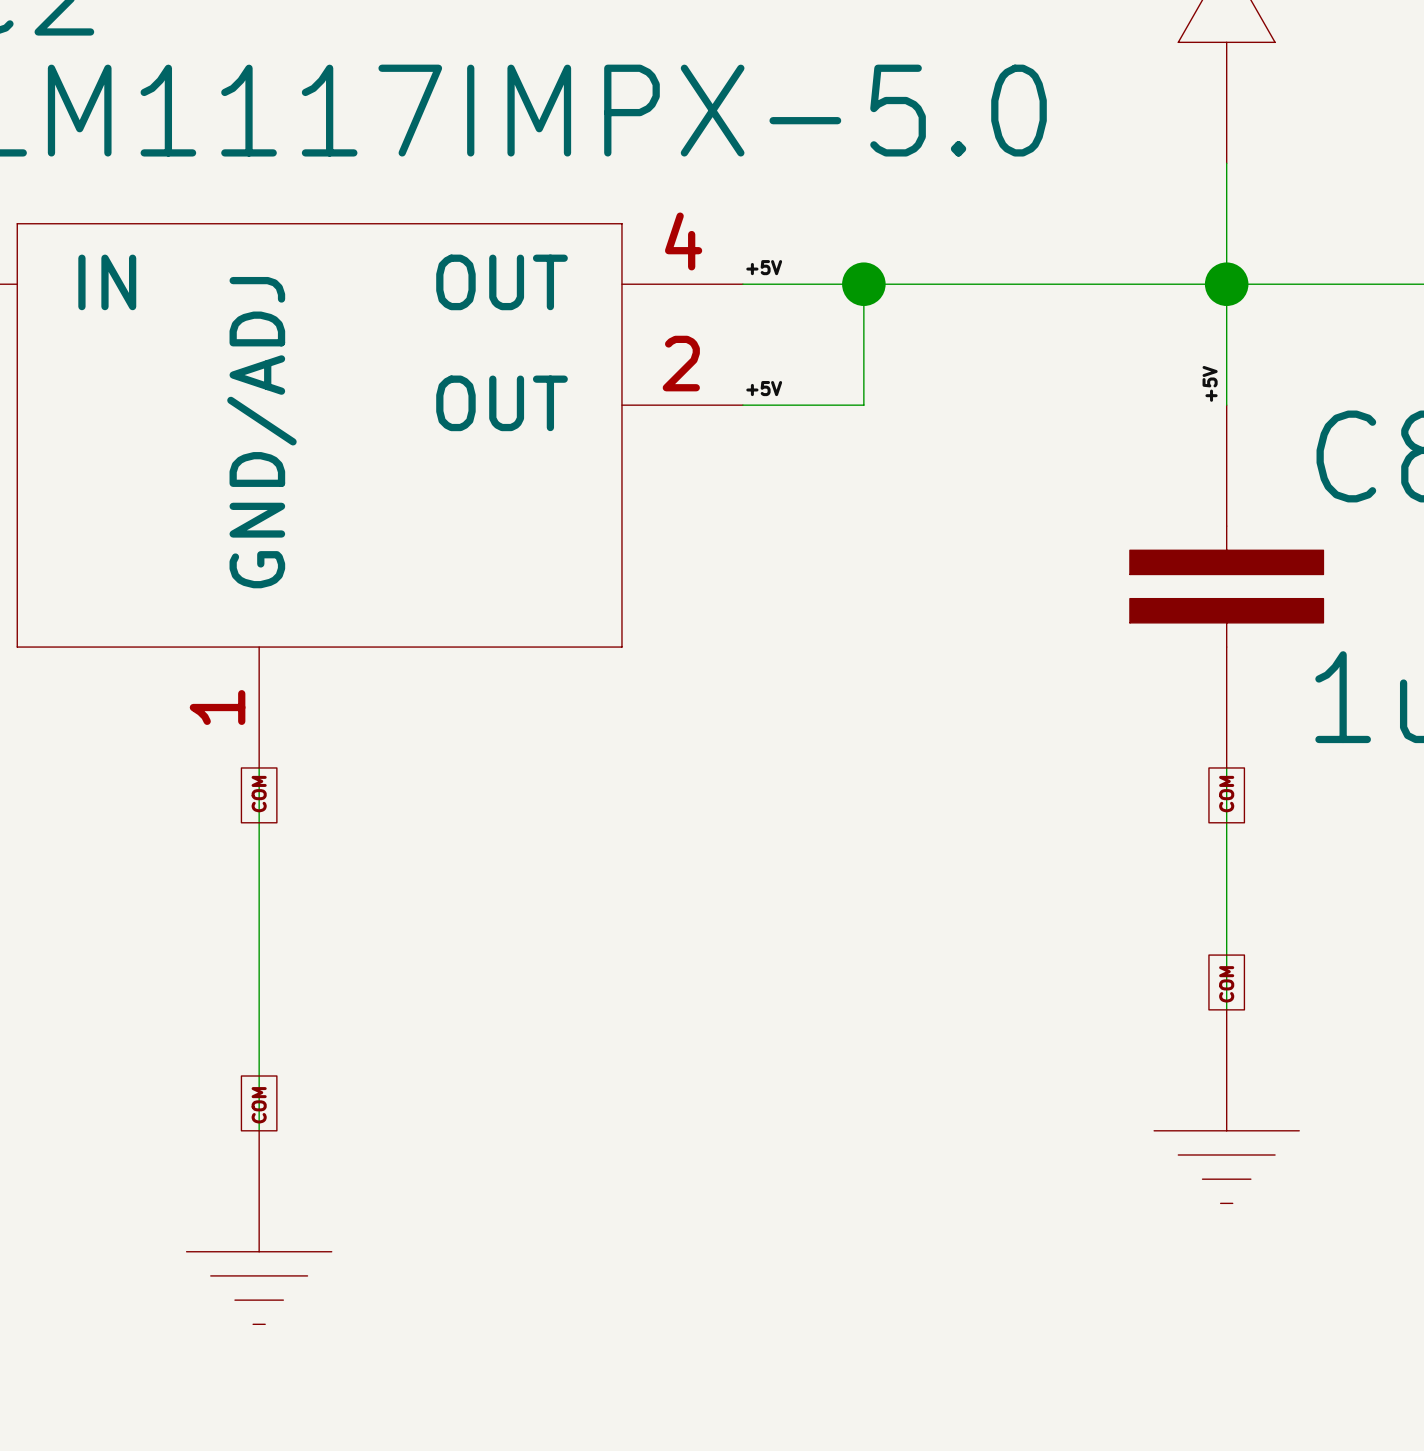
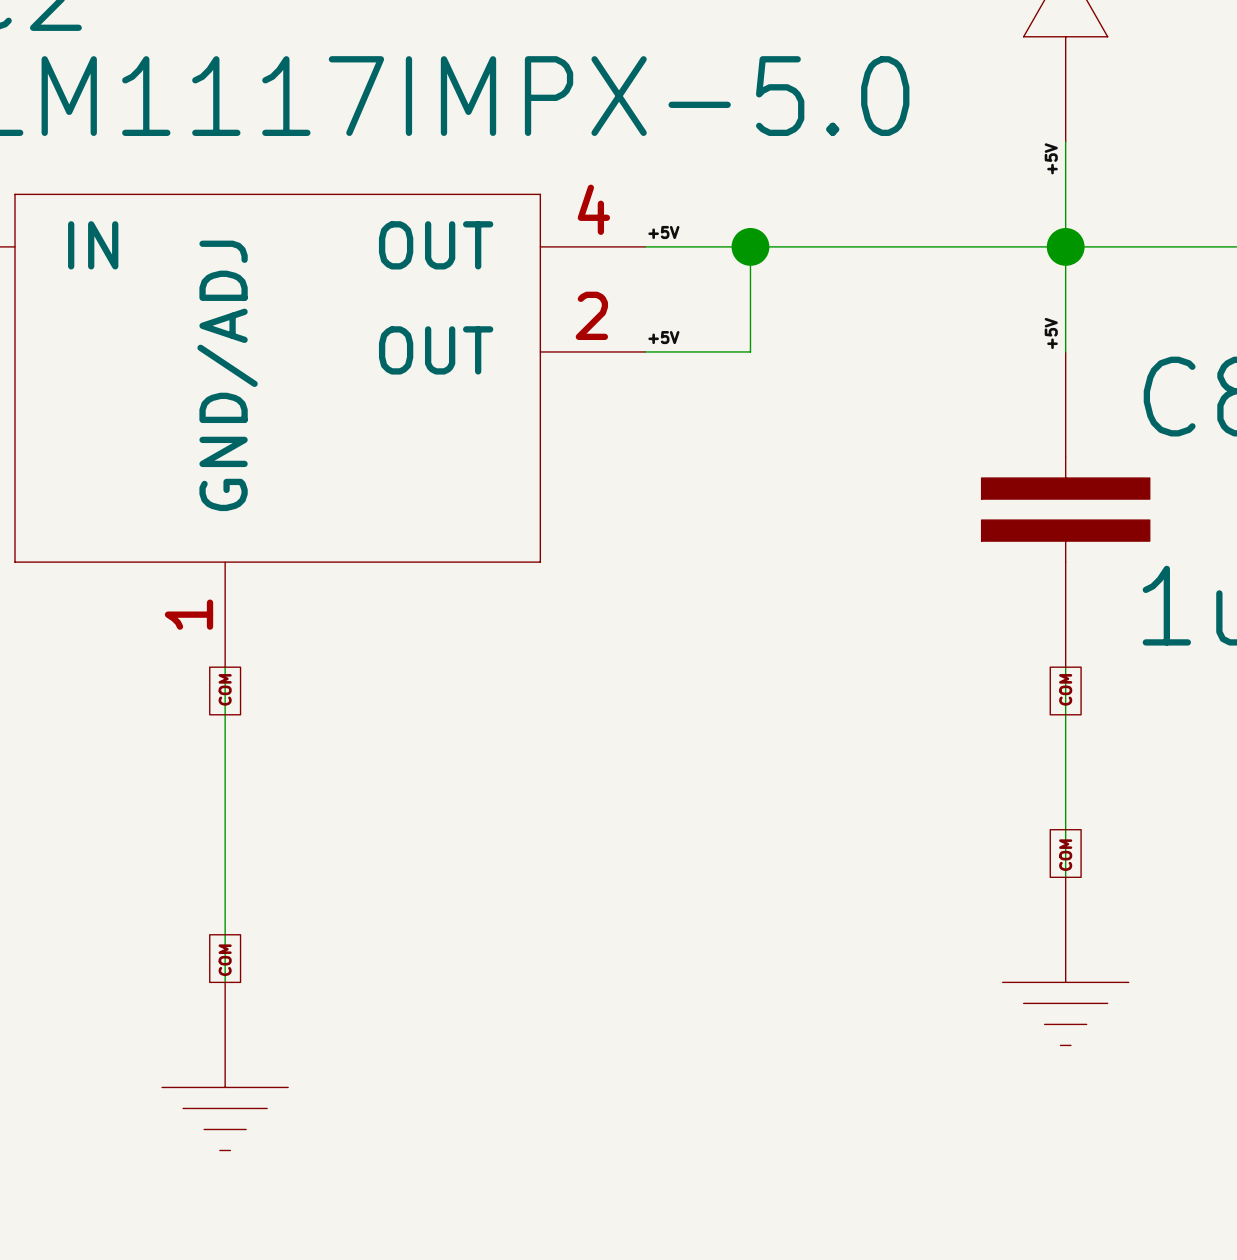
label: none -> +5V (1051, 158)

